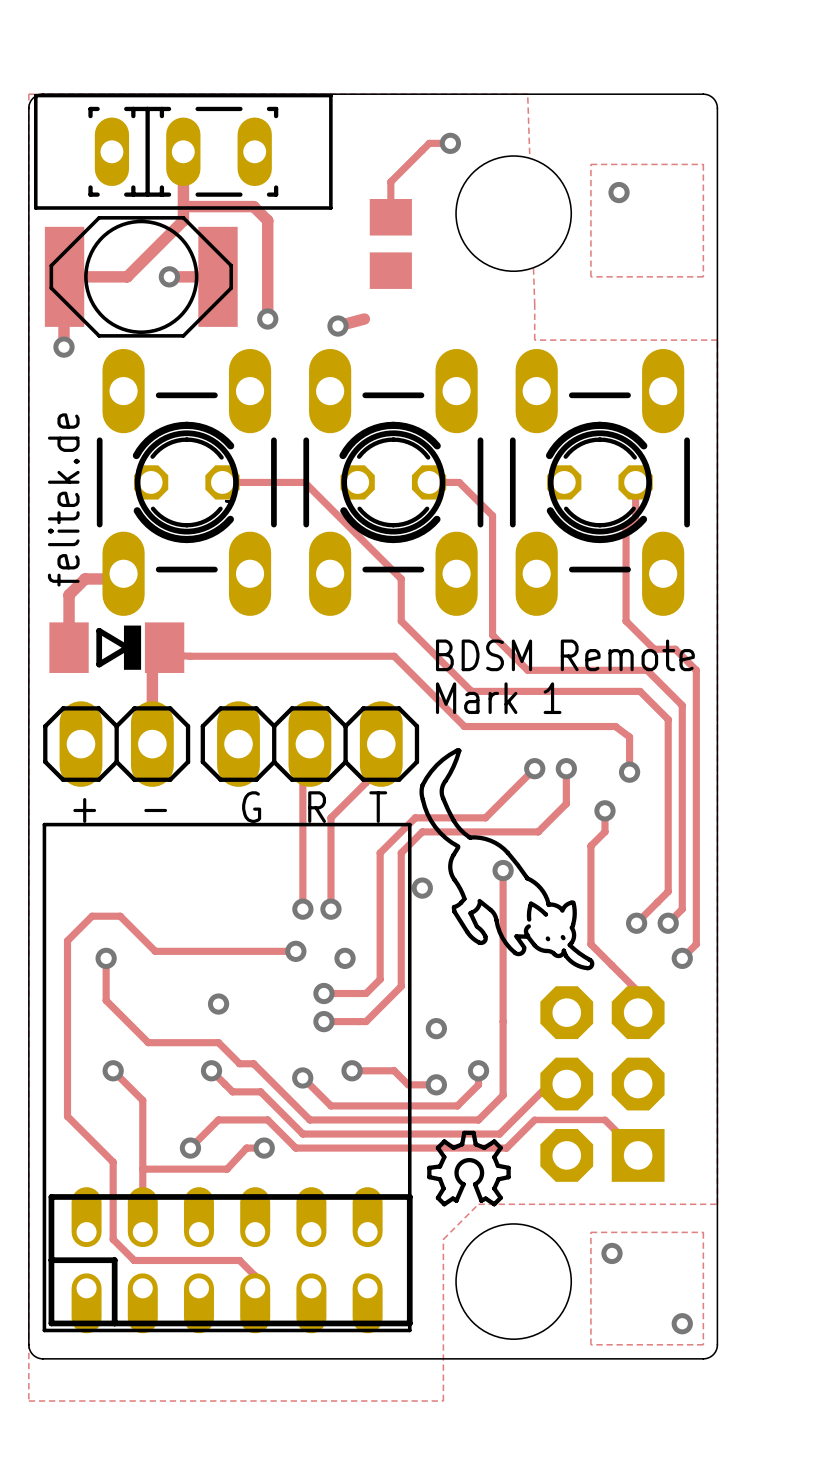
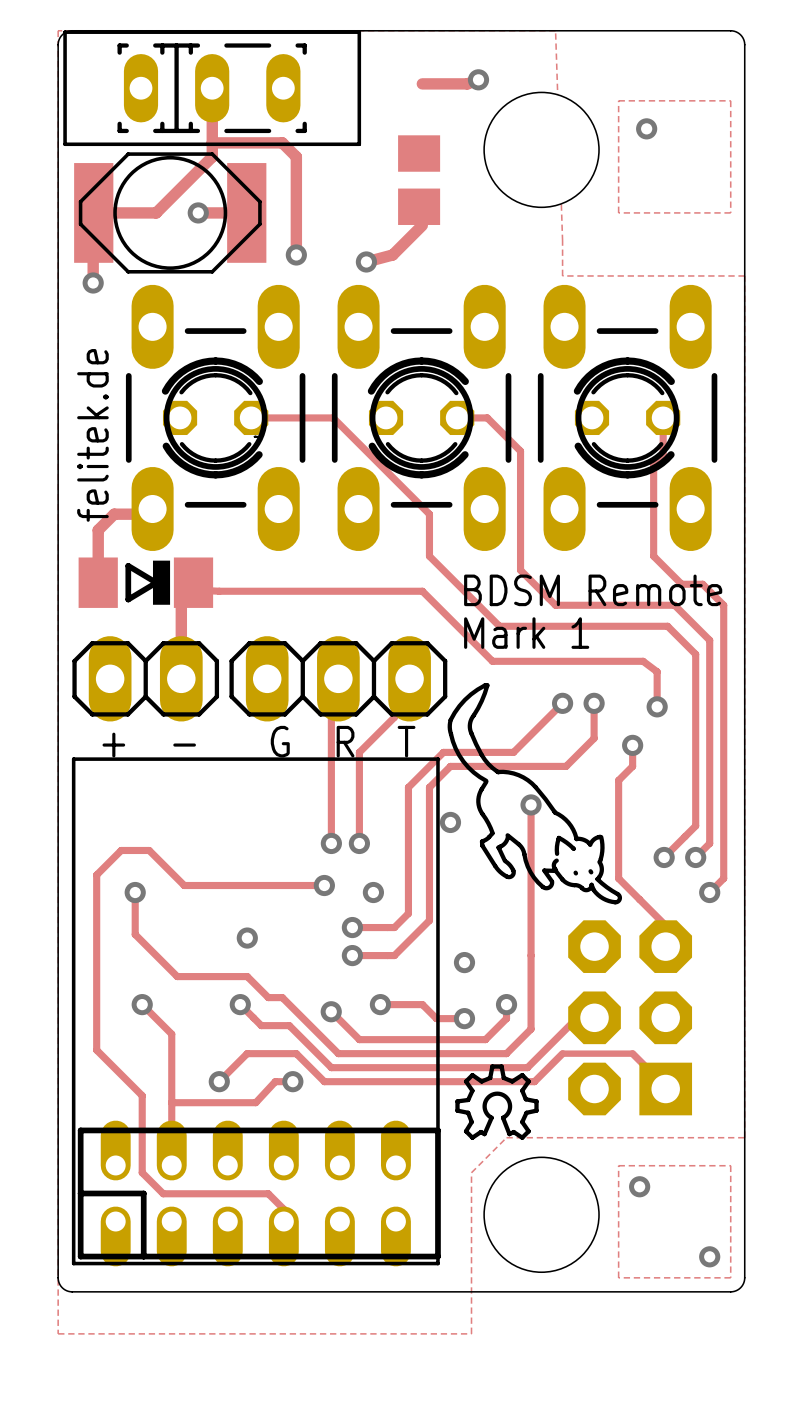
track: (450, 143) (429, 143) (390, 181) (390, 217) -> (478, 79) (467, 83) (422, 83)
track: none -> (422, 225) (392, 254)

